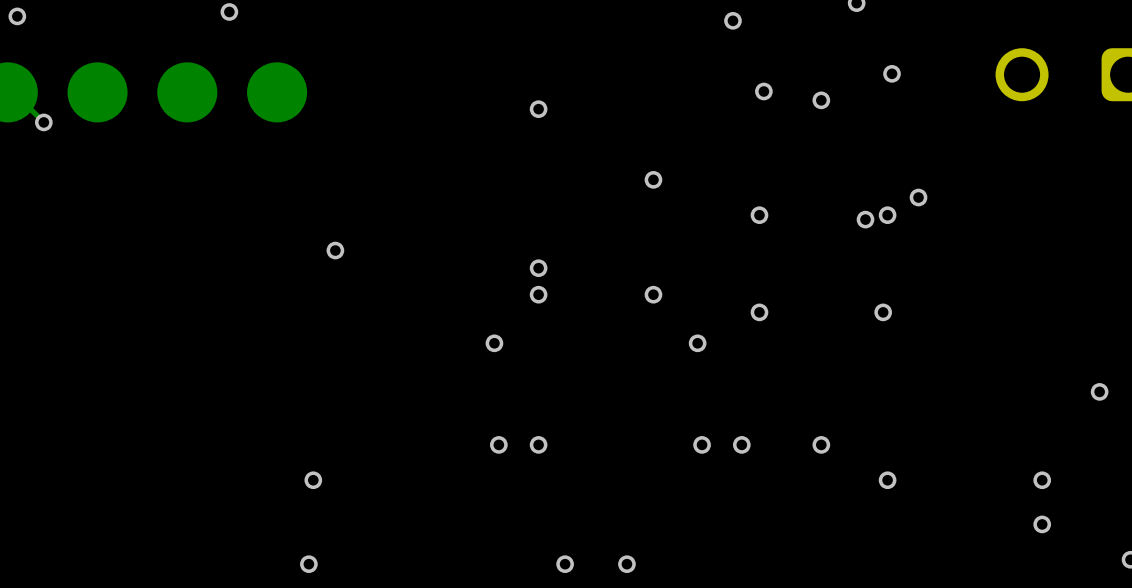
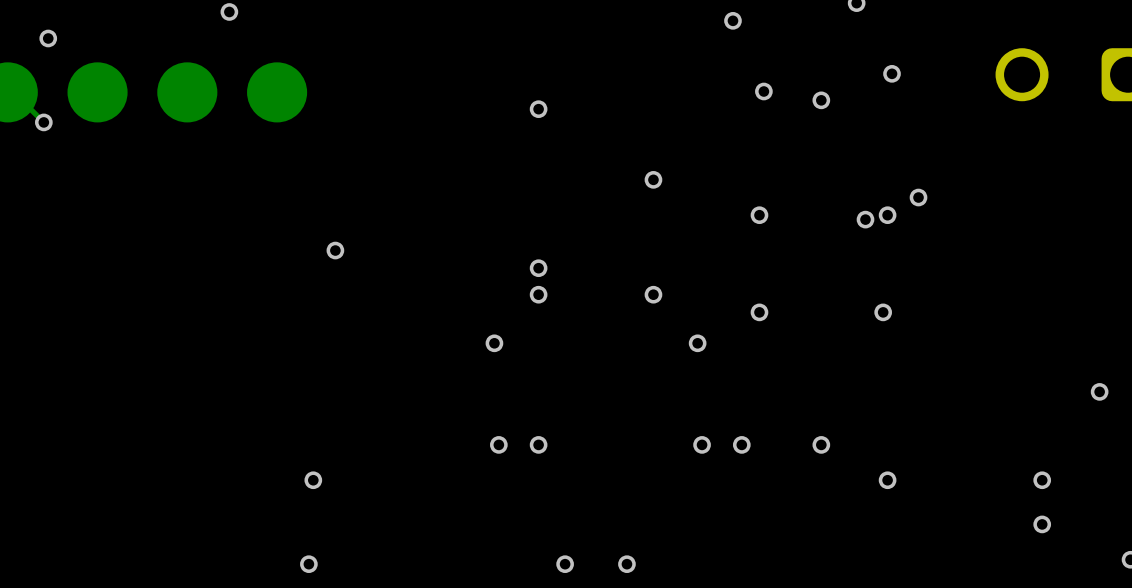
via: (17, 16) -> none
via: none -> (48, 38)

